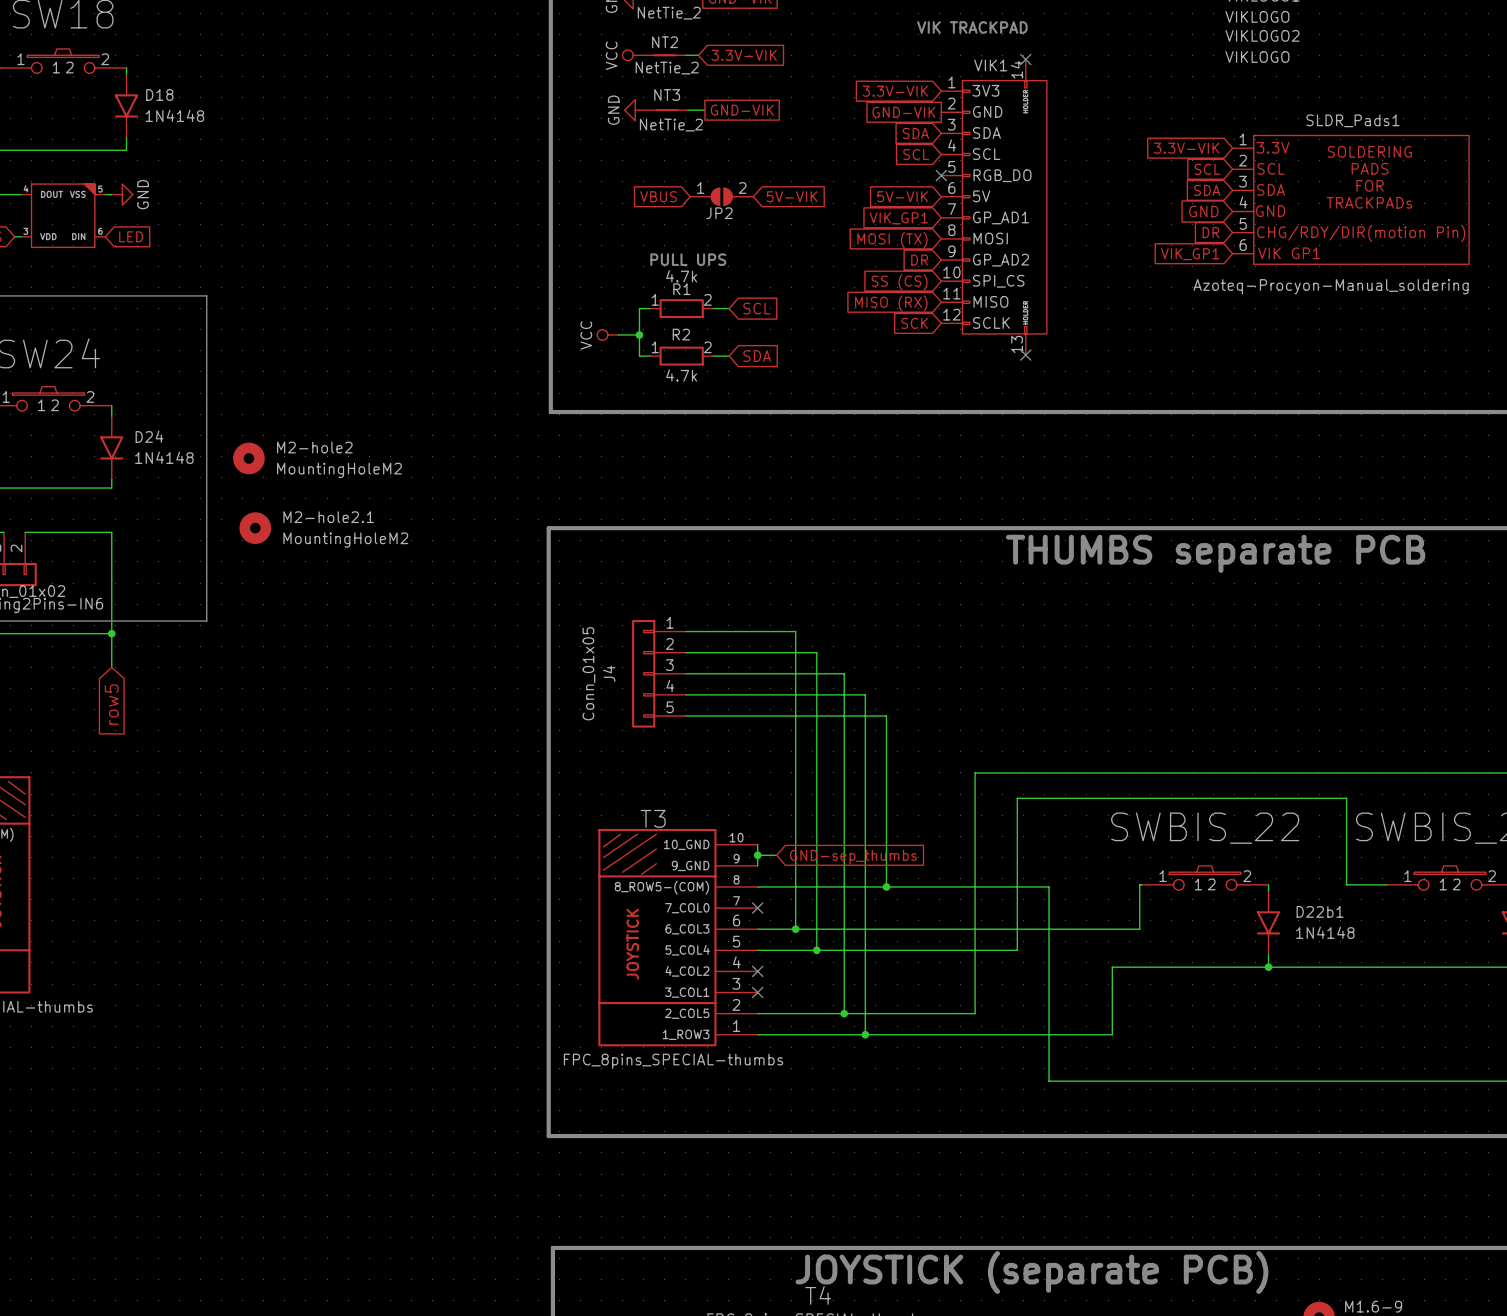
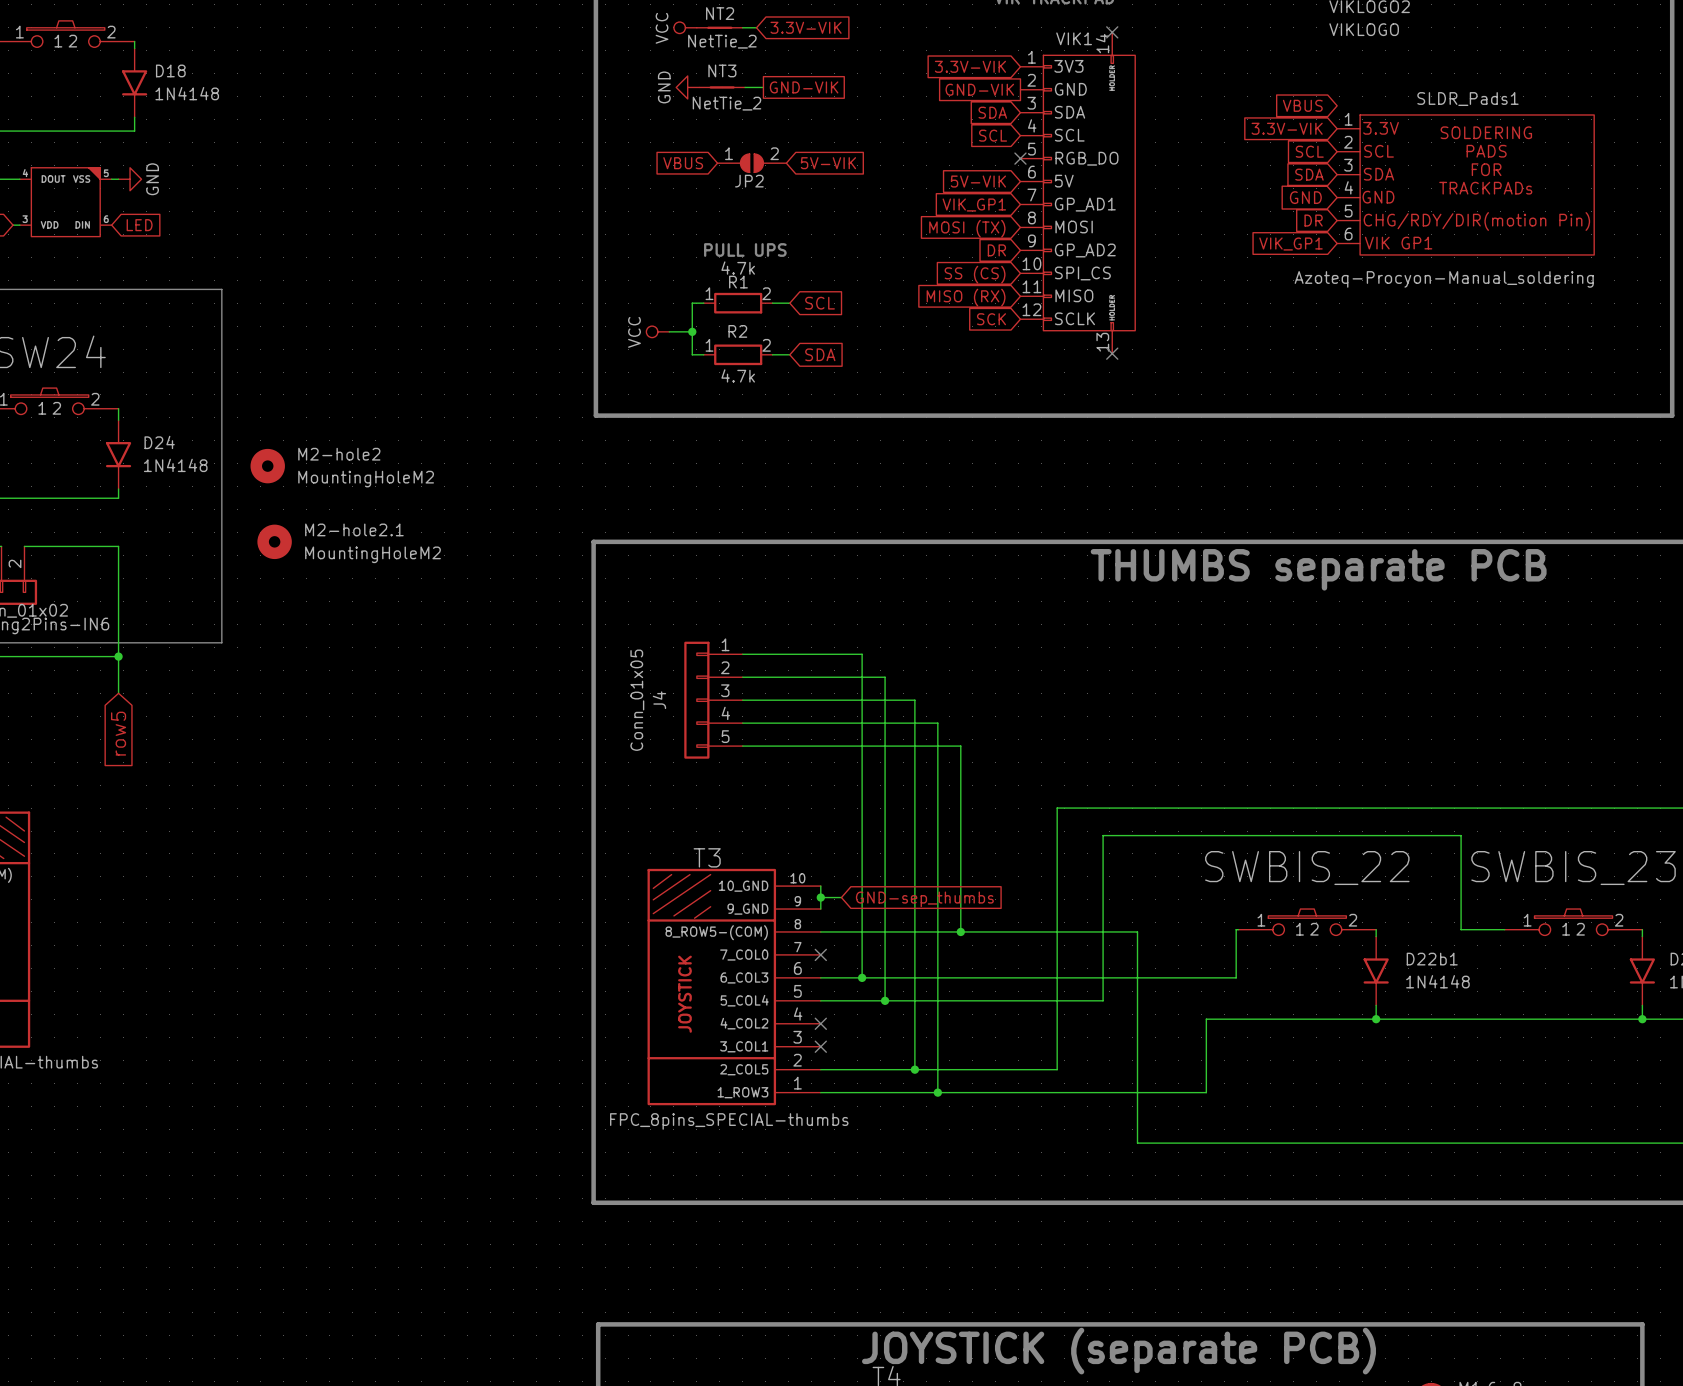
global label: none -> VBUS (1302, 105)
global label position: VBUS (658, 196) -> VBUS (683, 163)
JP2 position: (721, 196) -> (751, 163)
global label position: 5V-VIK (792, 196) -> 5V-VIK (828, 163)

